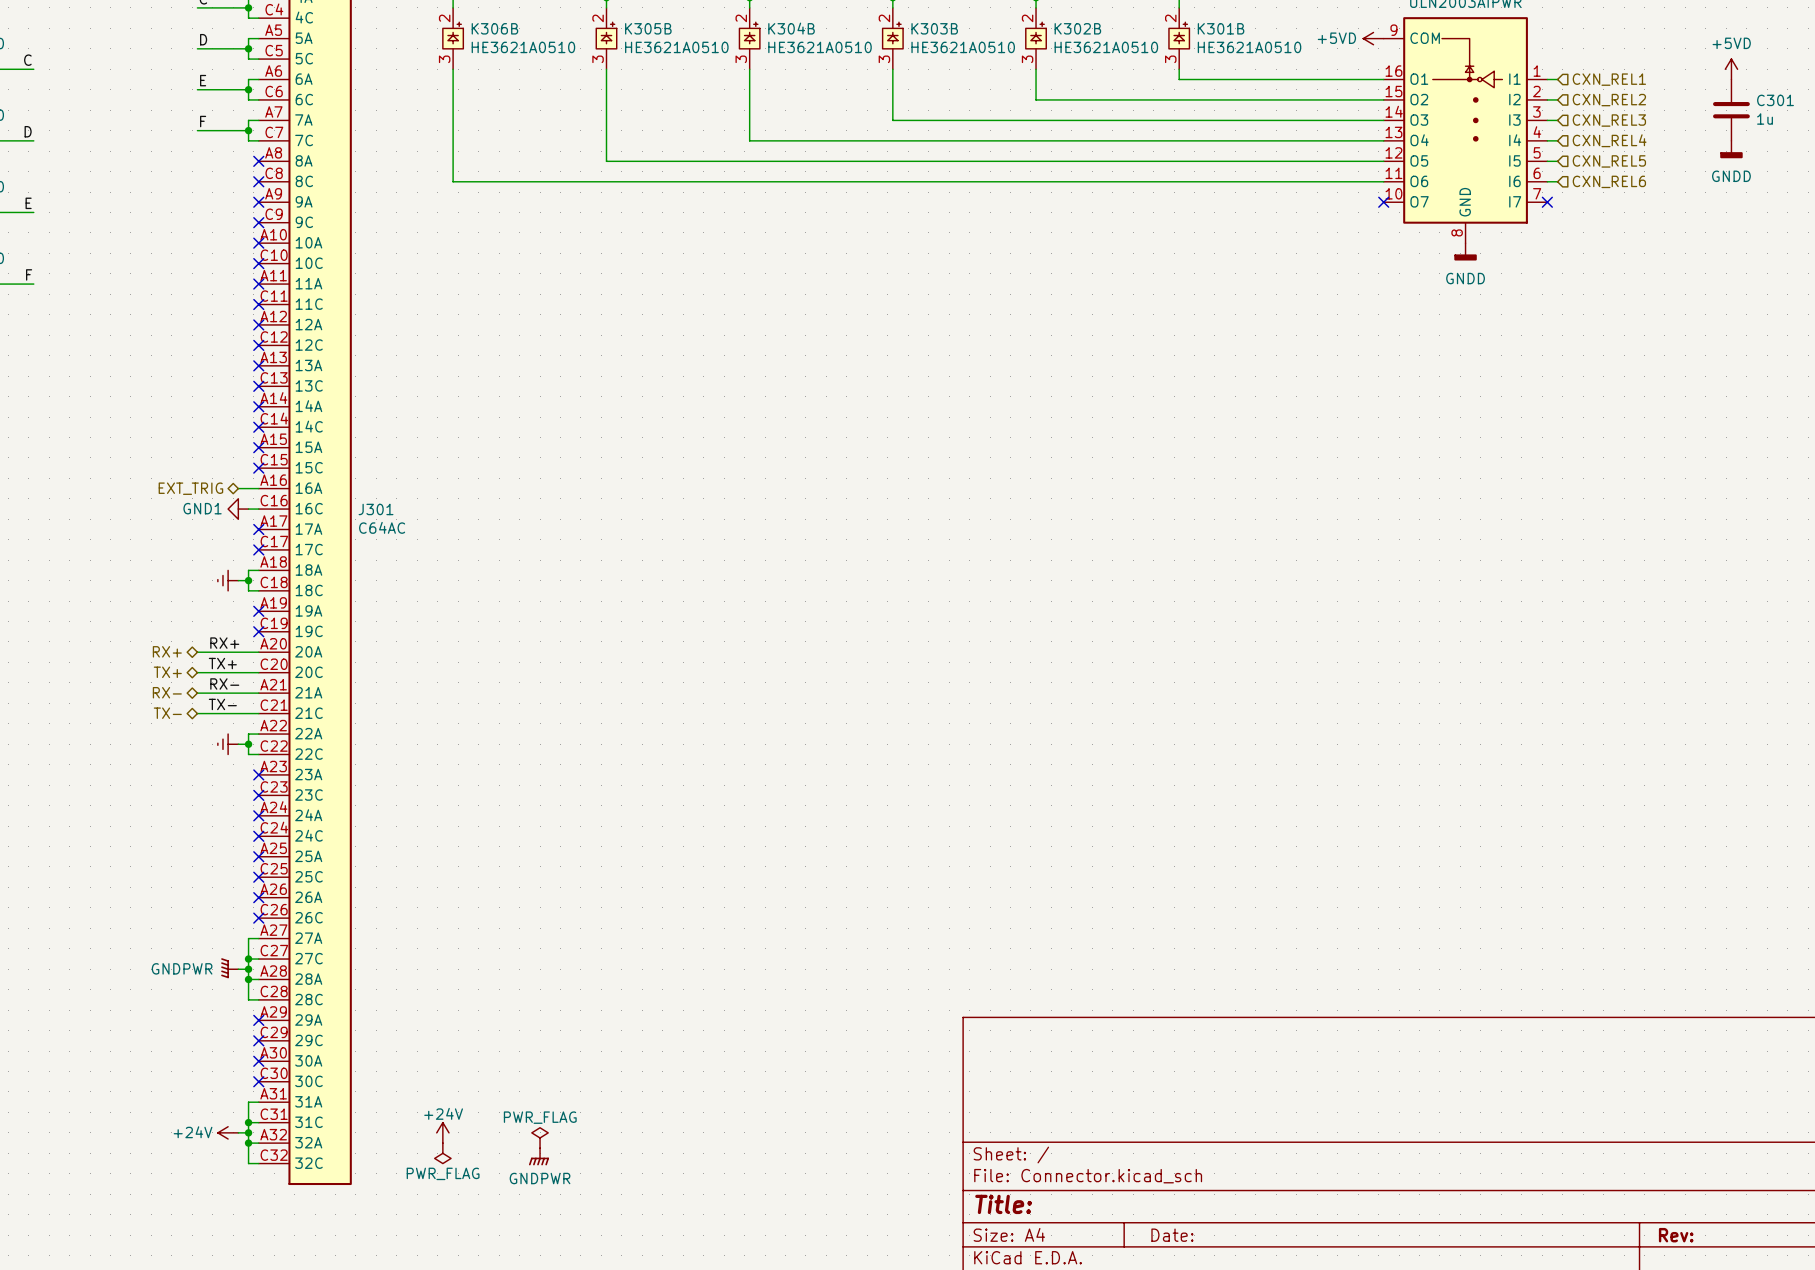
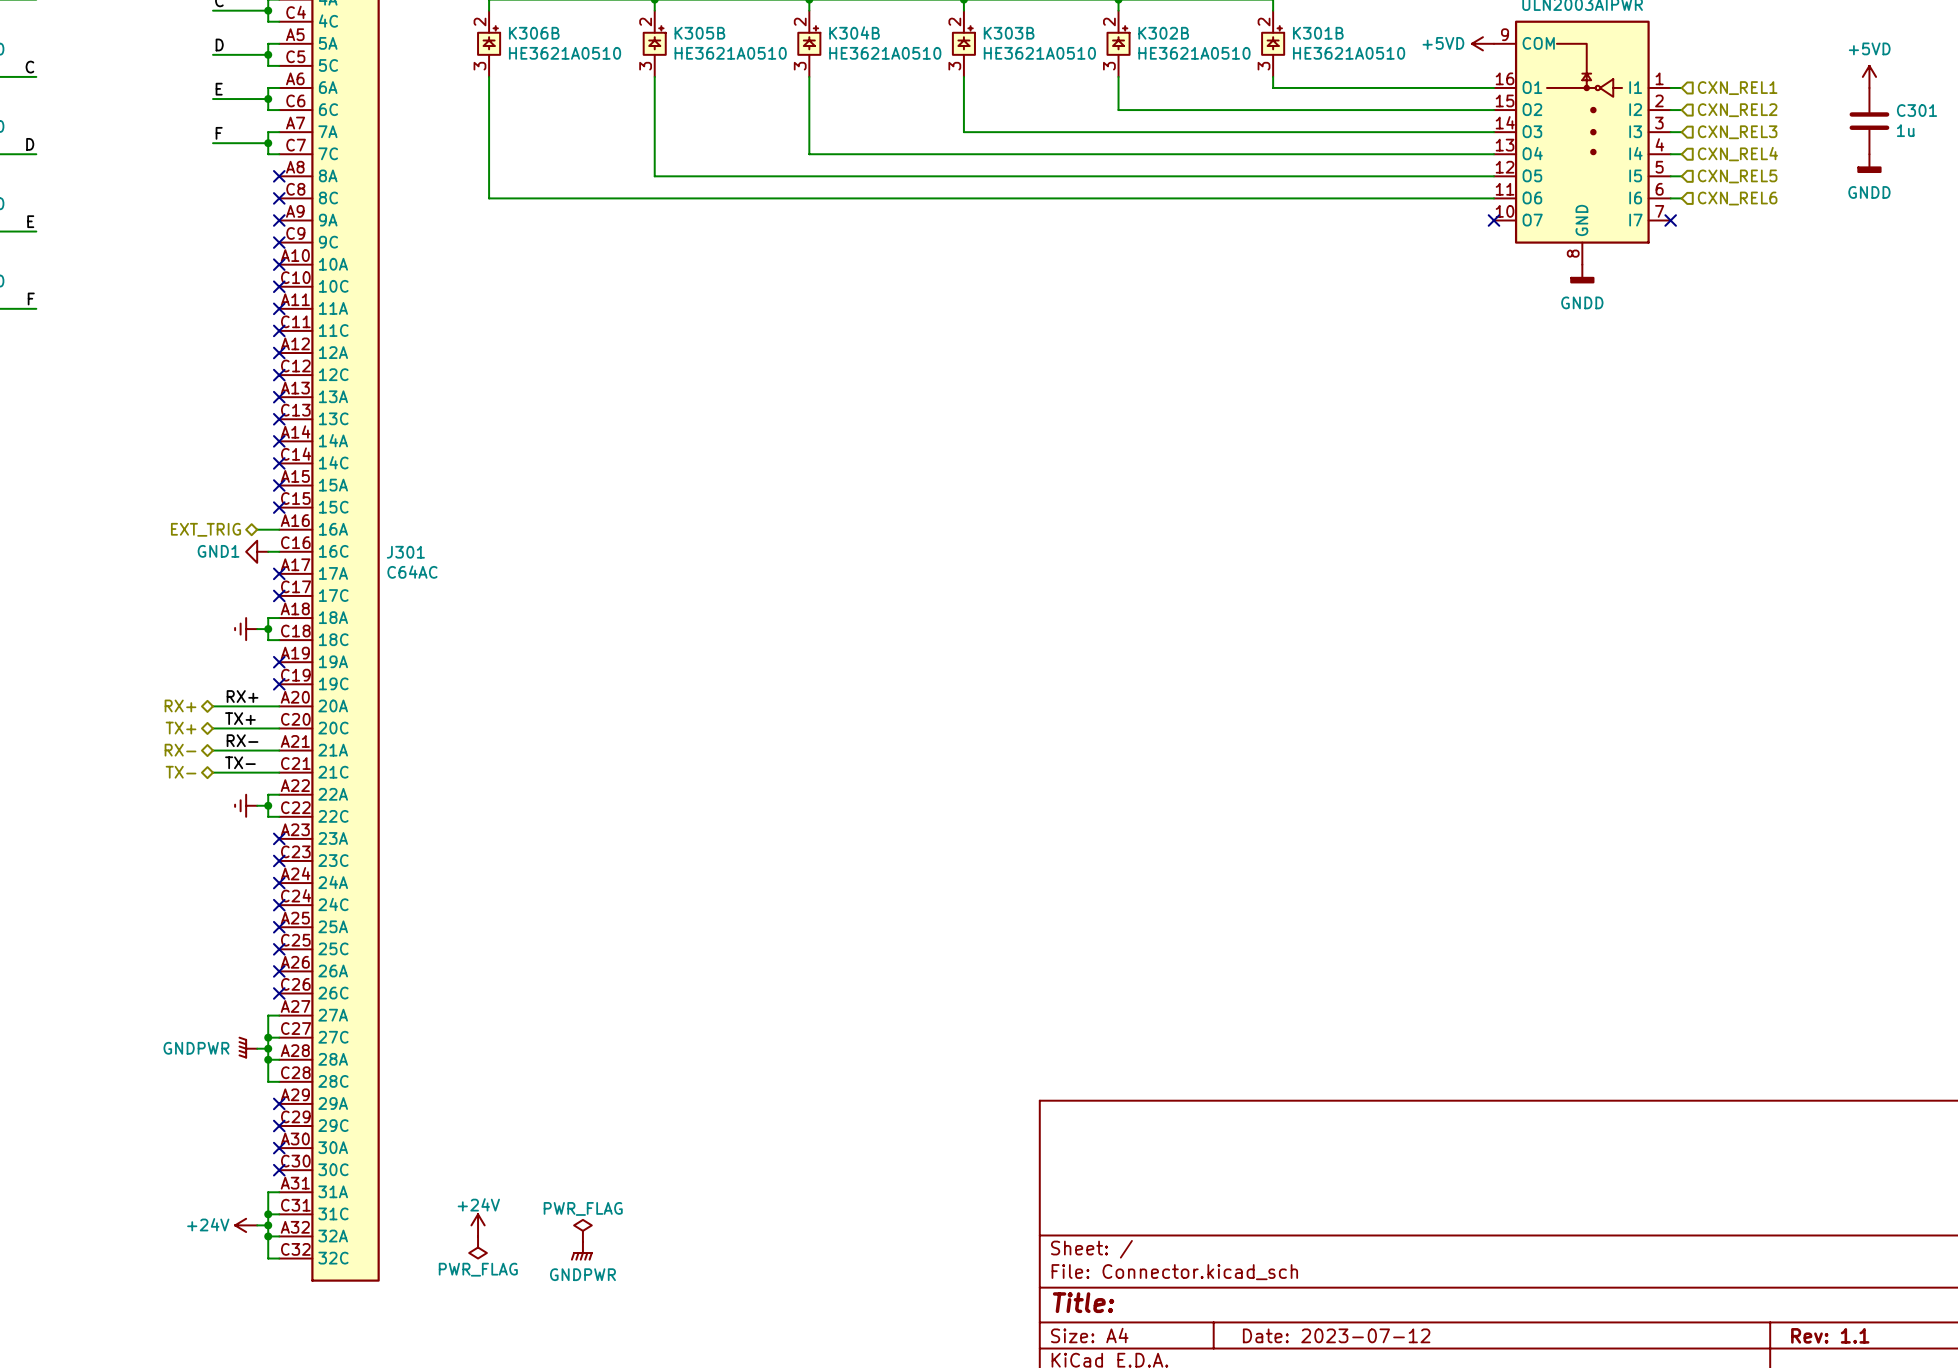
title block: Date: (1172, 1235) -> Date: 2023-07-12 (1336, 1335)
title block: Rev: (1676, 1235) -> Rev: 1.1 (1830, 1335)

